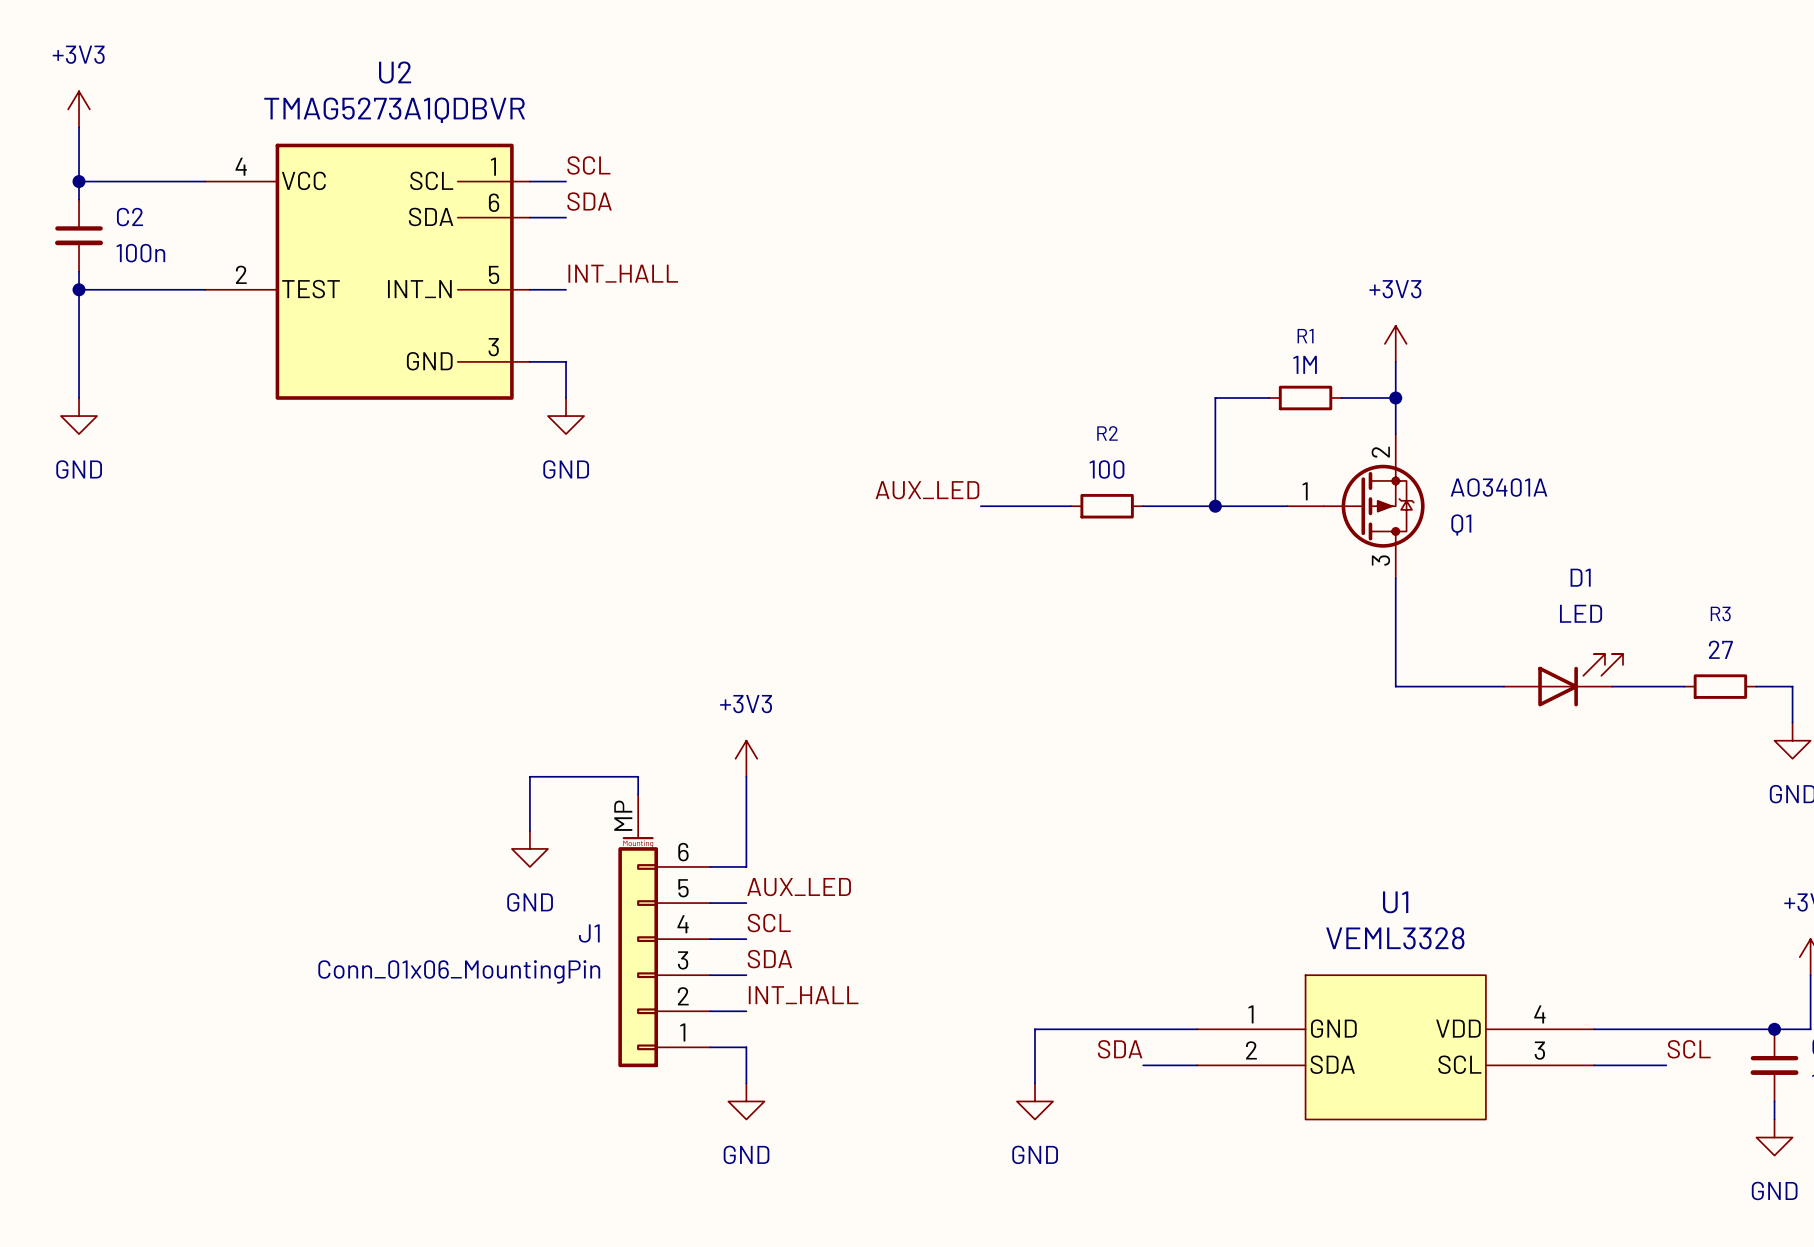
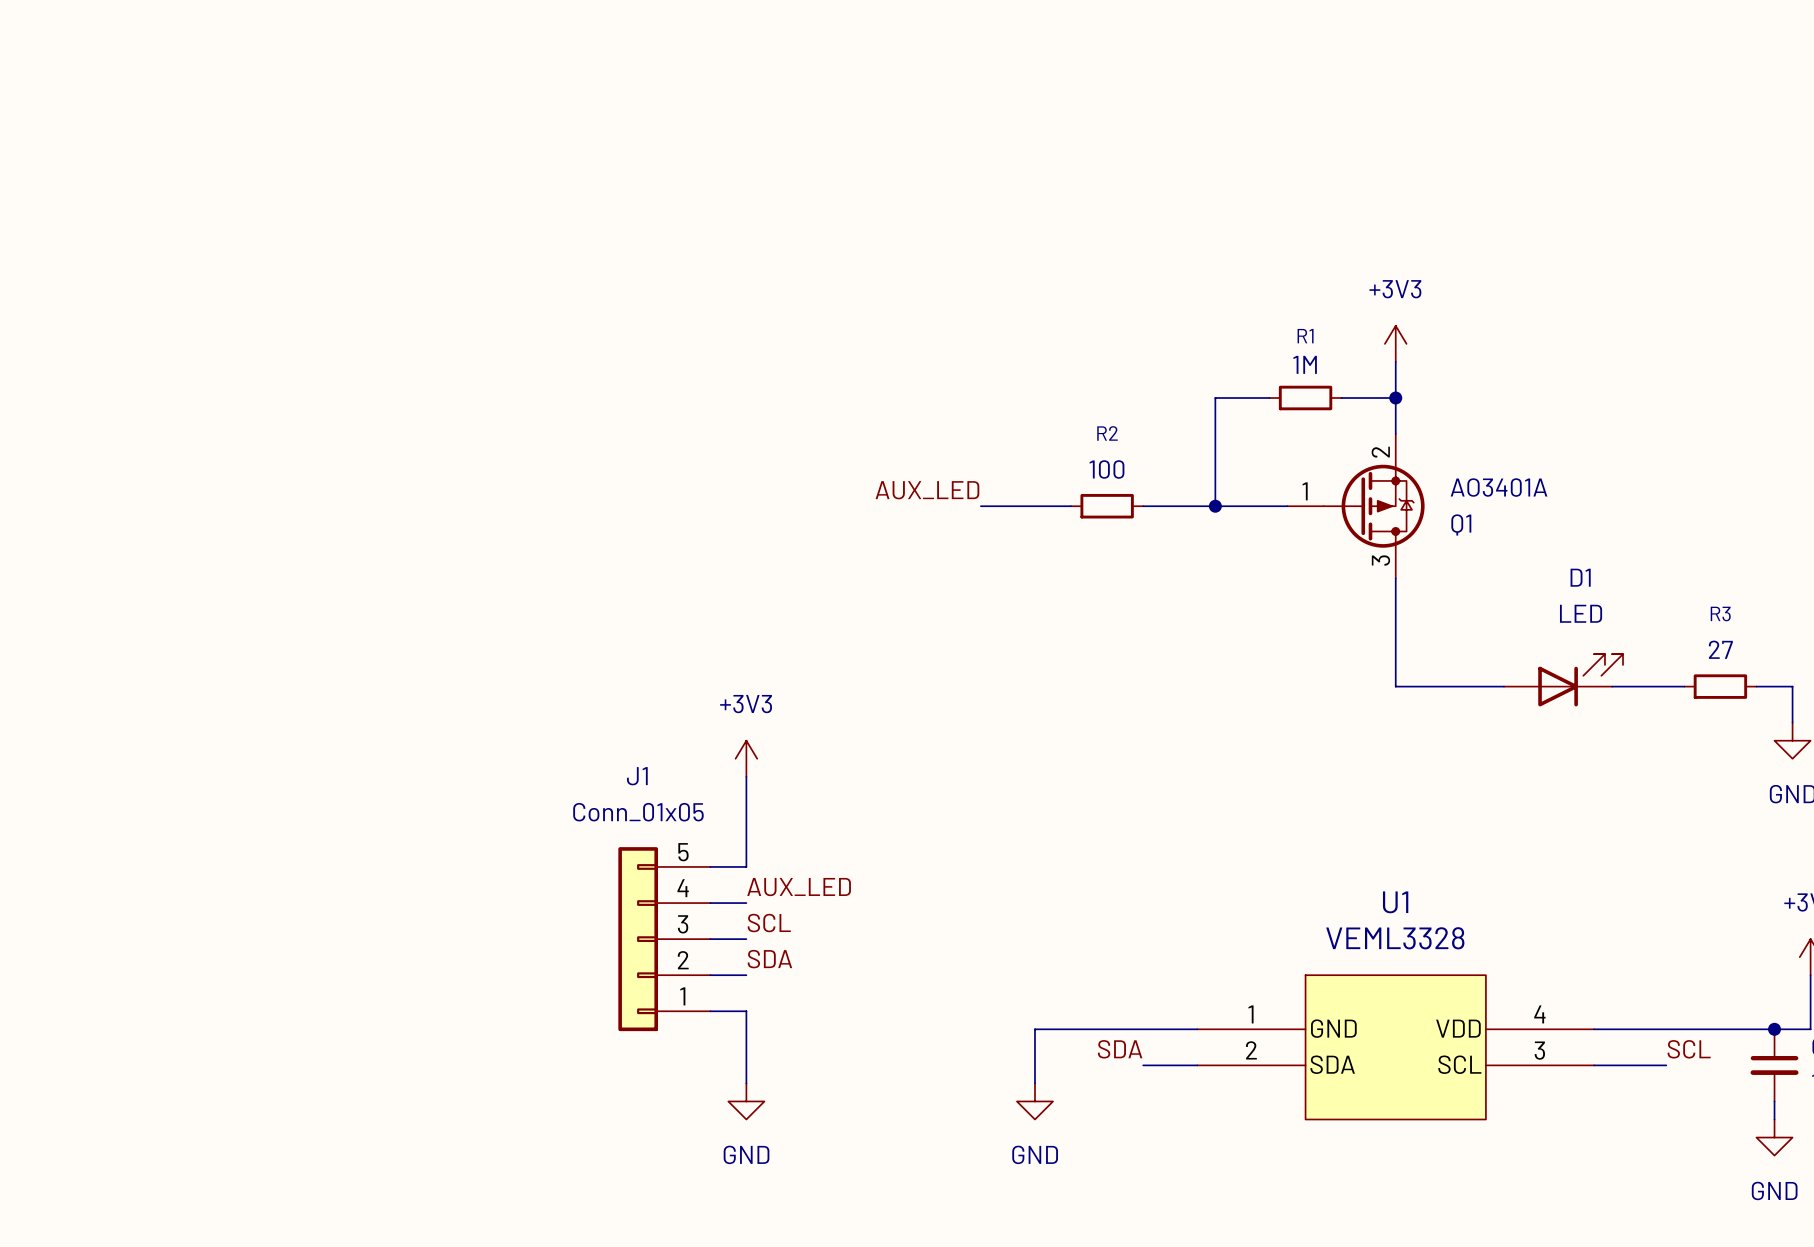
power symbol: +3V3 (79, 109) -> none
wire: (79, 127) (79, 199) -> none
label: SCL (588, 165) -> none
wire: (79, 181) (205, 181) -> none
junction: (79, 181) -> none
wire: (529, 181) (566, 181) -> none
label: SDA (589, 201) -> none
wire: (529, 217) (566, 217) -> none
C2: 100n (79, 235) -> none
wire: (79, 271) (79, 398) -> none
U2: TMAG5273A1QDBVR (367, 271) -> none
label: INT_HALL (623, 273) -> none
wire: (79, 289) (205, 289) -> none
junction: (79, 289) -> none
wire: (529, 289) (566, 289) -> none
wire: (529, 361) (566, 361) (566, 398) -> none
power symbol: GND (79, 416) -> none
power symbol: GND (566, 416) -> none
J1 symbol: [618, 794, 711, 1068] -> [618, 847, 711, 1032]
wire: (638, 794) (638, 776) (529, 776) (529, 830) -> none
power symbol: GND (529, 848) -> none
J1 name position: J1 (589, 933) -> J1 (637, 776)
J1 value: Conn_01x06_MountingPin (459, 971) -> Conn_01x05 (638, 812)
label: INT_HALL (803, 995) -> none
wire: (710, 1047) (746, 1047) -> (746, 1011) (746, 1047)

